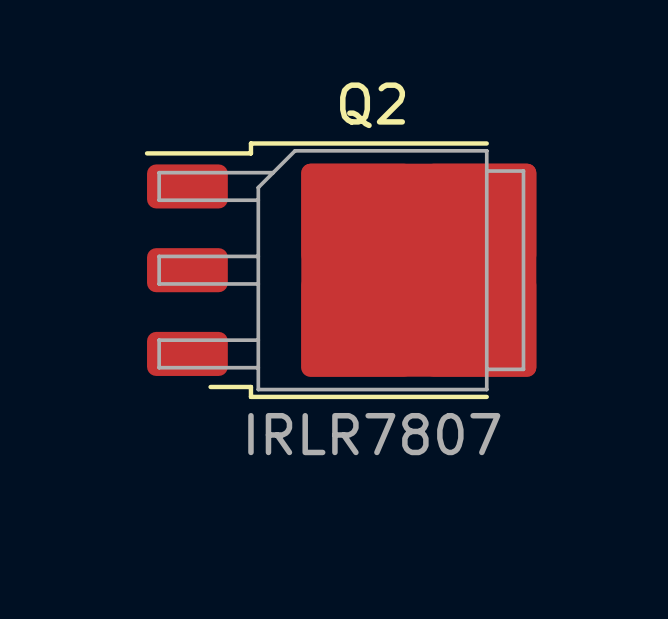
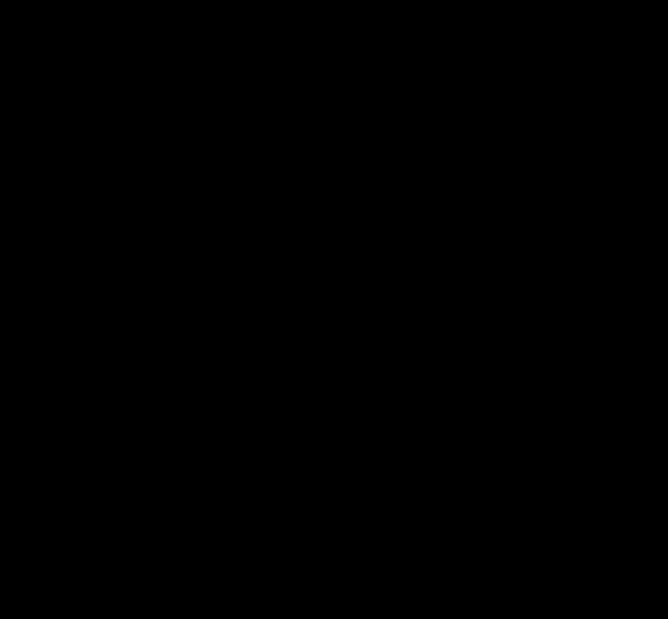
Q2: IRLR7807 (340, 270) -> none

